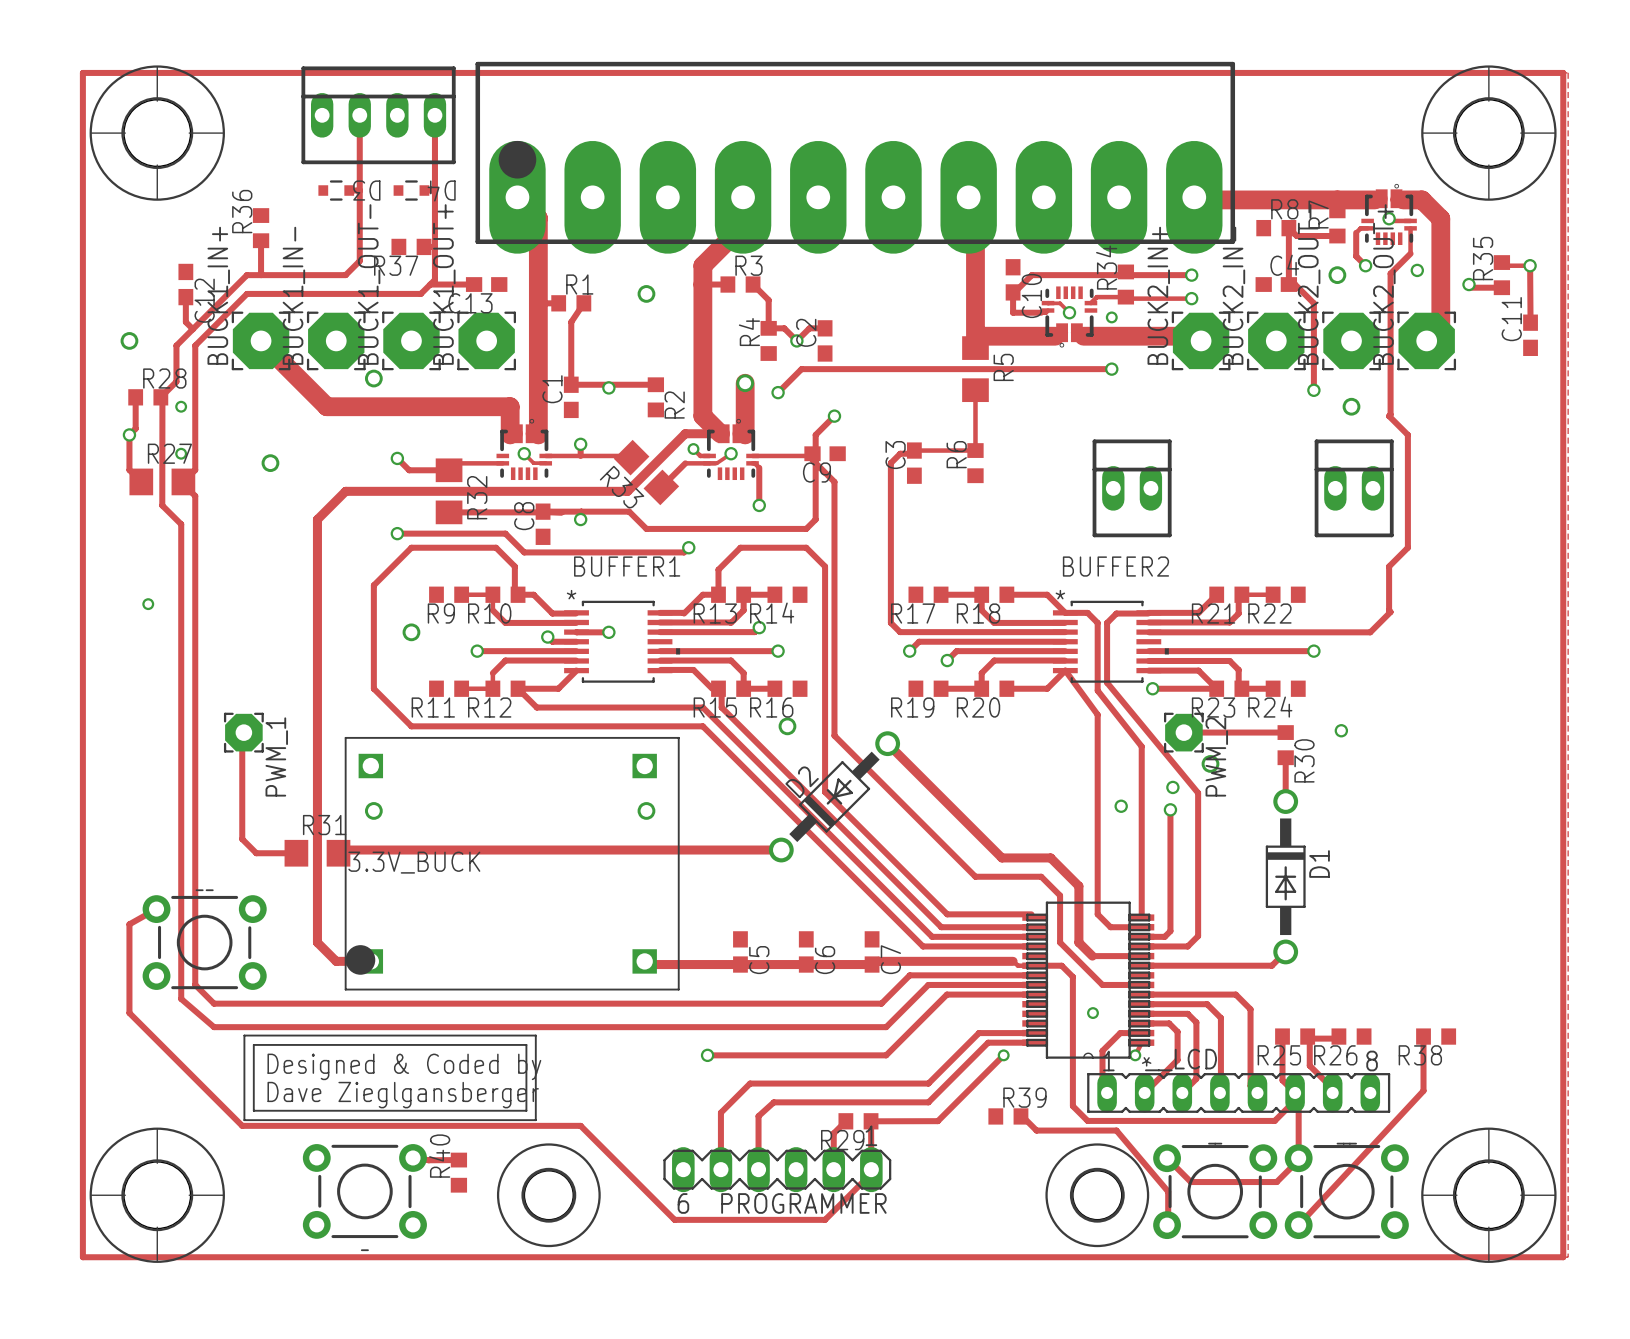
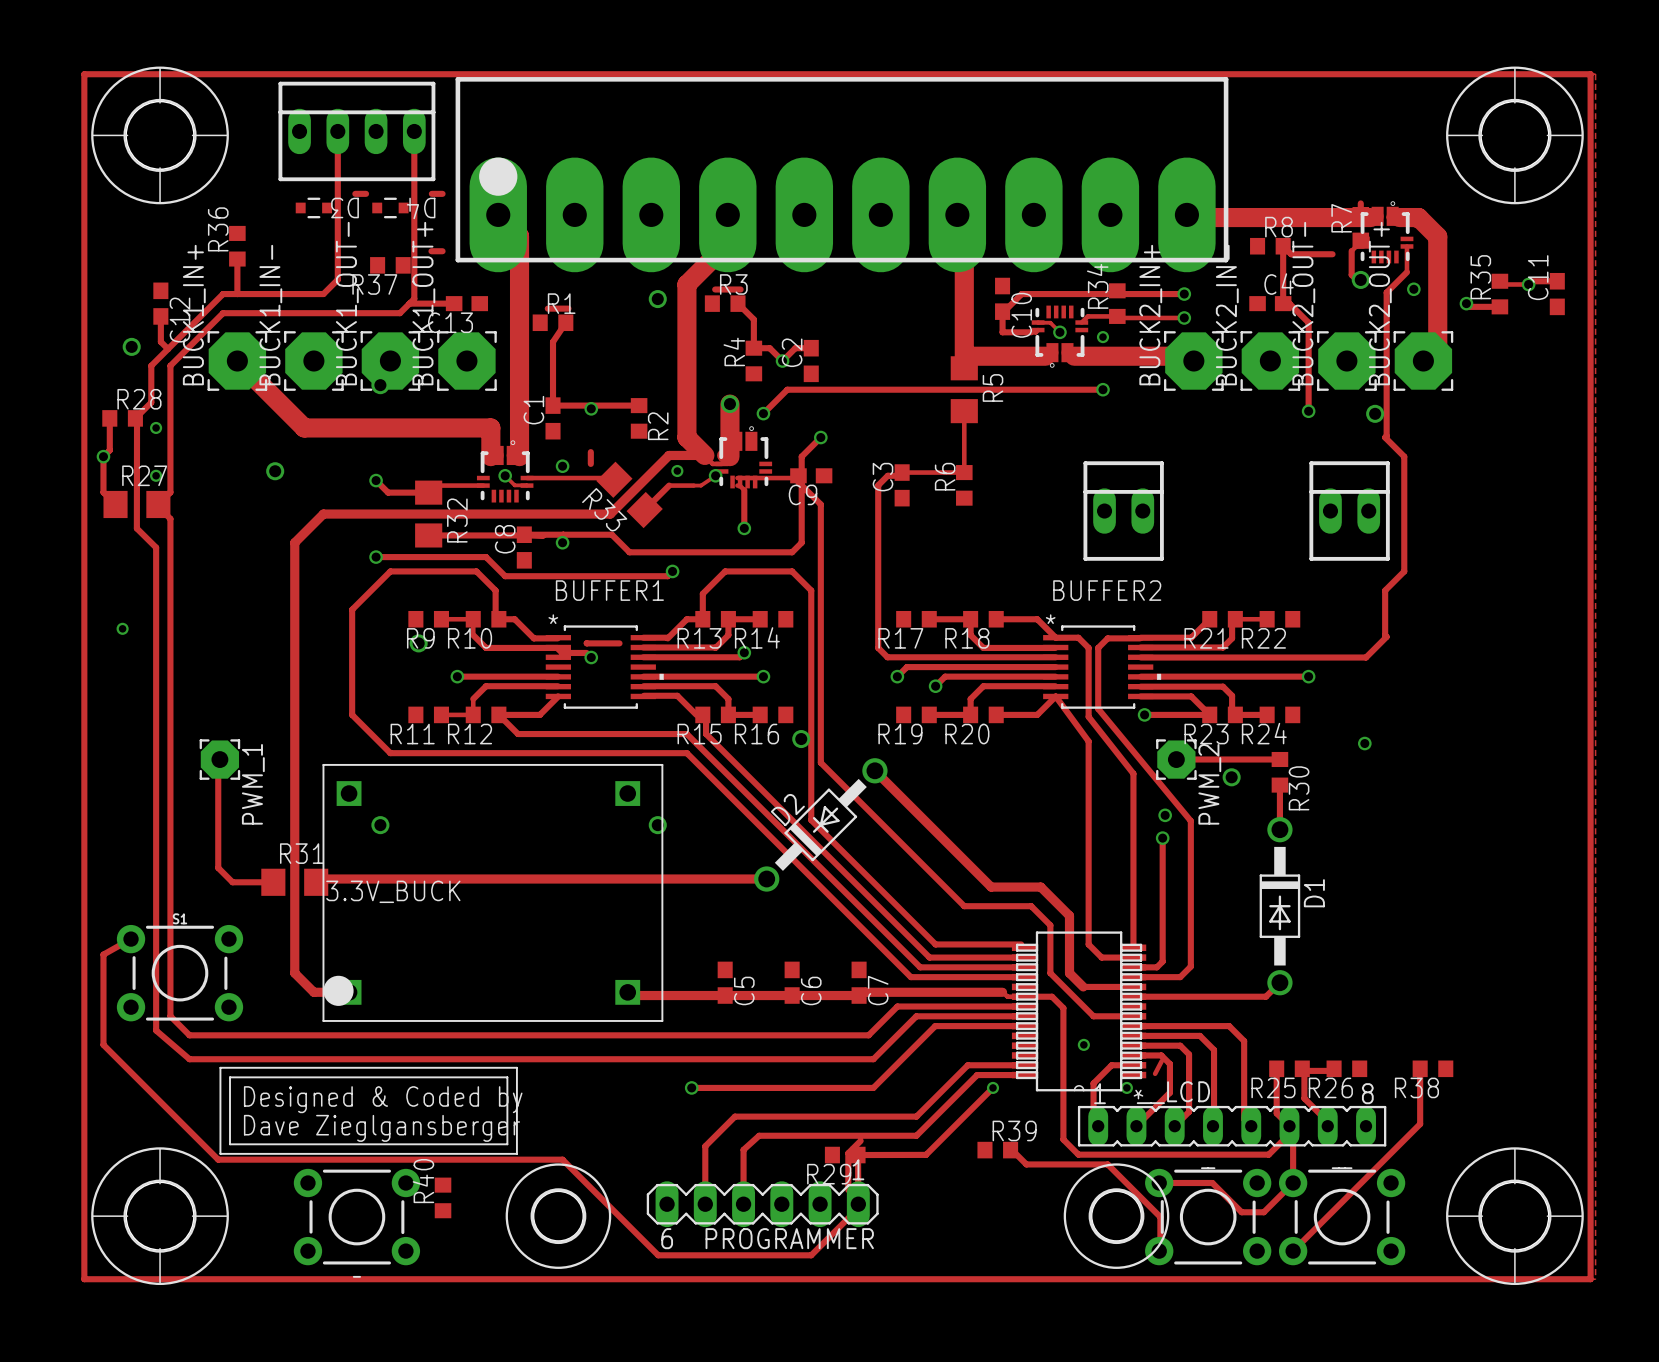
track: (359, 115) (359, 261) (345, 275) (246, 275) (176, 345) (176, 381) (160, 397) (162, 403) (162, 505) (181, 524) (181, 998) (214, 1027) (886, 1027) (928, 984) (1034, 984) -> (337, 131) (337, 279) (323, 294) (223, 294) (151, 365) (151, 402) (135, 418) (137, 424) (136, 528) (156, 547) (156, 1030) (189, 1059) (873, 1059) (916, 1016) (1024, 1016)
part: (378, 115) -> none
track: (434, 115) (434, 279) (420, 293) (246, 293) (195, 345) (195, 470) (183, 481) (195, 496) (195, 984) (214, 1003) (881, 1003) (909, 975) (1034, 975) -> (414, 131) (414, 298) (399, 313) (223, 313) (170, 365) (170, 492) (158, 504) (170, 518) (170, 1016) (189, 1035) (868, 1035) (897, 1006) (1024, 1006)
part: none -> (356, 131)
part position: (855, 157) -> (841, 174)
D3 position: (336, 190) -> (313, 207)
D4 position: (411, 190) -> (390, 207)
track: (517, 197) (538, 218) (538, 434) (531, 433) -> (498, 214) (519, 236) (519, 456) (512, 455)
track: (743, 197) (743, 225) (702, 265) (702, 416) (720, 433) -> (727, 214) (727, 243) (686, 284) (686, 437) (704, 455)
track: (968, 197) (975, 204) (975, 348) (977, 336) (1055, 336) (1062, 332) -> (957, 214) (964, 221) (964, 368) (965, 356) (1045, 356) (1049, 352) (1052, 352)
track: (1194, 197) (1196, 199) (1381, 198) -> (1186, 214) (1189, 217) (1377, 216)
track: (1396, 198) (1422, 199) (1440, 218) (1440, 326) (1426, 340) -> (1392, 216) (1418, 217) (1437, 236) (1437, 346) (1423, 361)
part position: (1389, 214) -> (1385, 232)
via: (1389, 218) -> none
R36 position: (261, 228) -> (237, 246)
R8 position: (1276, 228) -> (1270, 246)
track: (1367, 228) (1360, 228) (1356, 232) (1356, 256) (1365, 265) -> (1363, 246) (1356, 246) (1351, 251) (1351, 274) (1361, 284)
track: (1410, 228) (1410, 253) (1390, 273) (1389, 416) (1407, 434) (1407, 547) (1389, 566) (1390, 612) (1370, 632) (1148, 632) -> (1406, 246) (1406, 272) (1386, 292) (1385, 437) (1404, 456) (1404, 571) (1385, 590) (1386, 636) (1366, 657) (1140, 657)
track: (1337, 236) (1296, 236) (1288, 228) (1288, 284) (1295, 284) (1313, 303) (1313, 390) -> (1332, 254) (1291, 254) (1283, 246) (1283, 303) (1289, 303) (1308, 322) (1308, 411)
track: (261, 240) (261, 275) -> (237, 259) (237, 294)
R37 position: (411, 246) -> (390, 265)
track: (1501, 262) (1505, 265) (1530, 265) (1530, 262) (1530, 322) -> none
via: (1365, 265) -> none
via: (1530, 265) -> none
via: (1417, 270) -> none
track: (1191, 275) (1129, 275) (1125, 271) (1122, 275) (1031, 275) (1013, 292) (1013, 312) (1045, 312) (1048, 310) -> (1184, 294) (1120, 294) (1117, 290) (1114, 294) (1021, 294) (1002, 311) (1002, 332) (1035, 332) (1038, 330)
via: (1191, 275) -> none
R35 position: (1501, 275) -> (1499, 294)
track: none -> (1499, 281) (1503, 284) (1528, 284) (1528, 281) (1557, 281)
C10 position: (1013, 279) -> (1002, 298)
via: none -> (1528, 284)
C12 position: (185, 284) -> (160, 303)
track: (430, 284) (474, 284) -> (409, 303) (454, 303)
C13 position: (486, 284) -> (466, 303)
R3 position: (740, 284) -> (725, 303)
track: (753, 284) (768, 300) (768, 328) (784, 328) (796, 340) (809, 328) (825, 328) -> (737, 303) (753, 319) (753, 348) (769, 348) (782, 361) (795, 348) (811, 348)
R34 position: (1125, 284) -> (1117, 303)
C4 position: (1276, 284) -> (1270, 303)
via: none -> (1413, 289)
track: (1469, 284) (1469, 287) (1501, 287) -> (1466, 303) (1466, 306) (1499, 306)
via: (1469, 284) -> none
via: none -> (1184, 294)
track: (185, 297) (185, 322) (192, 329) -> (160, 316) (160, 341) (168, 349)
track: (1191, 298) (1096, 297) (1090, 303) -> (1184, 317) (1087, 316) (1081, 322)
via: (1191, 298) -> none
via: none -> (1466, 303)
R1 position: (571, 303) -> (553, 322)
track: (583, 303) (571, 322) (571, 384) (655, 384) -> (565, 322) (553, 341) (553, 405) (639, 405)
track: (1048, 303) (1060, 303) (1069, 312) -> (1038, 322) (1050, 322) (1059, 332)
via position: (1069, 312) -> (1059, 332)
via: none -> (1184, 317)
part position: (1069, 317) -> (1059, 336)
via position: (1111, 317) -> (1102, 337)
track: (1076, 332) (1083, 336) (1196, 336) (1201, 340) -> (1067, 352) (1070, 352) (1074, 356) (1189, 356) (1193, 361)
C11 position: (1530, 335) -> (1557, 294)
track: (261, 340) (326, 406) (510, 406) (510, 434) (516, 433) -> (237, 361) (304, 427) (490, 427) (490, 456) (497, 455)
BUCK1_IN+ position: (261, 340) -> (237, 361)
BUCK1_IN- position: (336, 340) -> (313, 361)
BUCK1_OUT- position: (411, 340) -> (390, 361)
BUCK1_OUT+ position: (486, 340) -> (466, 361)
R4 position: (768, 340) -> (753, 361)
via: (796, 340) -> none
C2 position: (825, 340) -> (811, 361)
BUCK2_IN+ position: (1201, 340) -> (1193, 361)
BUCK2_IN- position: (1276, 340) -> (1270, 361)
BUCK2_OUT- position: (1351, 340) -> (1346, 361)
BUCK2_OUT+ position: (1426, 340) -> (1423, 361)
via: none -> (782, 361)
R5 position: (975, 369) -> (964, 389)
track: (1111, 369) (801, 369) (778, 392) -> (1102, 389) (787, 389) (763, 413)
via position: (1111, 369) -> (1102, 389)
track: (745, 383) (745, 434) (738, 433) -> (729, 404) (729, 456) (723, 455)
via position: (745, 383) -> (729, 404)
via: (608, 387) -> none
track: (975, 390) (975, 450) (914, 450) (911, 453) (900, 453) (890, 463) (890, 622) (900, 632) (1065, 632) -> (964, 411) (964, 472) (902, 472) (898, 475) (887, 475) (878, 485) (878, 647) (887, 657) (1055, 657)
via position: (1313, 390) -> (1308, 411)
via: (778, 392) -> none
track: (135, 397) (135, 428) (129, 434) (129, 470) (141, 481) -> (109, 418) (109, 450) (103, 456) (103, 492) (115, 504)
R28 position: (148, 397) -> (122, 418)
C1 position: (571, 397) -> (553, 418)
R2 position: (655, 397) -> (639, 418)
via: none -> (591, 408)
via: (181, 406) -> none
via: none -> (763, 413)
track: (834, 416) (815, 434) (815, 519) (806, 528) (646, 528) (629, 511) (449, 512) -> (820, 437) (801, 456) (801, 542) (792, 552) (629, 552) (611, 534) (428, 535)
via: (834, 416) -> none
via: none -> (156, 427)
via: none -> (820, 437)
track: (720, 433) (685, 433) (627, 491) (345, 491) (317, 519) (317, 942) (336, 961) (370, 961) -> (704, 455) (669, 455) (610, 514) (323, 514) (294, 542) (294, 973) (313, 992) (348, 992)
via position: (129, 434) -> (103, 456)
via: (580, 444) -> none
part position: (524, 449) -> (505, 471)
via position: (693, 449) -> (677, 471)
via: (181, 453) -> none
track: (524, 453) (533, 463) (545, 463) -> (505, 475) (514, 485) (527, 485)
via: (524, 453) -> none
track: (731, 453) (716, 463) (685, 463) (661, 487) -> (715, 475) (701, 485) (669, 485) (644, 510)
via: (731, 453) -> none
track: (812, 453) (812, 455) (752, 455) -> (798, 475) (798, 478) (737, 478)
track: (812, 453) (812, 459) (834, 481) (834, 735) (975, 876) (1041, 876) (1060, 895) (1060, 942) (1102, 984) (1141, 984) -> (798, 475) (798, 482) (820, 504) (820, 762) (964, 906) (1031, 906) (1050, 925) (1050, 973) (1093, 1016) (1133, 1016)
C9 position: (825, 453) -> (811, 475)
track: (545, 455) (631, 455) (631, 457) -> (527, 478) (614, 478) (614, 479)
track: (397, 458) (409, 470) (449, 470) (455, 463) (502, 463) -> (376, 480) (388, 492) (428, 492) (435, 485) (483, 485)
via position: (397, 458) -> (376, 480)
via: none -> (562, 466)
track: (752, 463) (759, 467) (759, 505) -> (737, 485) (744, 490) (744, 528)
C3 position: (914, 463) -> (902, 485)
R6 position: (975, 463) -> (964, 485)
via: none -> (156, 475)
via: none -> (505, 475)
via: none -> (715, 475)
R33 position: (646, 472) -> (629, 494)
R27 position: (162, 481) -> (136, 504)
part position: (1132, 488) -> (1123, 511)
part position: (1354, 488) -> (1349, 511)
R32 position: (449, 491) -> (428, 514)
via: (759, 505) -> none
via position: (580, 519) -> (562, 542)
via: none -> (744, 528)
C8 position: (543, 524) -> (524, 547)
track: (397, 533) (505, 533) (524, 552) (684, 552) (688, 547) -> (376, 557) (486, 557) (505, 576) (667, 576) (672, 571)
via position: (397, 533) -> (376, 557)
via: (688, 547) -> none
via: none -> (672, 571)
R9 position: (449, 594) -> (428, 619)
track: (461, 594) (492, 594) (492, 610) (505, 622) (576, 622) -> (441, 619) (473, 619) (473, 635) (486, 647) (558, 647)
R10 position: (505, 594) -> (486, 619)
R13 position: (731, 594) -> (715, 619)
track: (774, 594) (743, 594) (743, 610) (731, 622) (660, 622) -> (760, 619) (728, 619) (728, 635) (715, 647) (643, 647)
R14 position: (787, 594) -> (773, 619)
R17 position: (928, 594) -> (916, 619)
track: (941, 594) (981, 594) (981, 610) (994, 622) (1065, 622) -> (929, 619) (970, 619) (970, 635) (983, 647) (1055, 647)
R18 position: (994, 594) -> (983, 619)
track: (1006, 594) (1047, 594) (1065, 612) (1087, 612) (1097, 622) (1097, 690) (1141, 746) (1141, 917) -> (996, 619) (1037, 619) (1055, 637) (1078, 637) (1088, 647) (1088, 716) (1133, 773) (1133, 947)
track: (1216, 594) (1198, 612) (1116, 613) (1107, 622) (1107, 682) (1198, 793) (1198, 936) (1187, 946) (1141, 946) -> (1209, 619) (1191, 637) (1107, 638) (1098, 647) (1098, 708) (1190, 821) (1190, 966) (1180, 977) (1133, 977)
R21 position: (1229, 594) -> (1222, 619)
track: (1273, 594) (1241, 594) (1238, 597) (1238, 613) (1229, 622) (1148, 622) -> (1267, 619) (1235, 619) (1232, 622) (1232, 638) (1223, 647) (1140, 647)
R22 position: (1285, 594) -> (1279, 619)
via position: (148, 604) -> (122, 628)
track: (576, 612) (552, 613) (533, 594) (518, 594) (514, 591) (514, 566) (496, 547) (411, 547) (373, 585) (373, 688) (411, 726) (702, 726) (923, 946) (1034, 946) -> (558, 637) (533, 638) (514, 619) (498, 619) (495, 616) (495, 590) (476, 571) (390, 571) (352, 609) (352, 714) (390, 753) (686, 753) (910, 977) (1024, 977)
track: (660, 612) (684, 613) (702, 594) (718, 594) (718, 569) (740, 547) (806, 547) (825, 566) (825, 792) (947, 914) (1031, 914) (1034, 917) -> (643, 637) (667, 638) (686, 619) (702, 619) (702, 593) (725, 571) (792, 571) (811, 590) (811, 820) (935, 944) (1021, 944) (1024, 947)
track: (759, 627) (754, 632) (660, 632) -> (744, 652) (739, 657) (643, 657)
via: (759, 627) -> none
via: (608, 632) -> none
via: (547, 637) -> none
BUFFER1 position: (622, 641) -> (604, 667)
via: none -> (744, 652)
track: (1065, 641) (919, 641) (909, 651) -> (1055, 667) (906, 667) (897, 676)
BUFFER2 position: (1110, 641) -> (1102, 667)
via: none -> (591, 657)
track: (477, 651) (576, 651) -> (457, 676) (558, 676)
via position: (477, 651) -> (457, 676)
track: (778, 651) (660, 651) -> (763, 676) (643, 676)
via: (778, 651) -> none
via: (909, 651) -> none
track: (1065, 651) (956, 651) (947, 660) -> (1055, 676) (945, 676) (935, 686)
track: (1313, 651) (1148, 651) -> (1308, 676) (1140, 676)
via position: (1313, 651) -> (1308, 676)
track: (576, 660) (505, 660) (492, 673) (492, 688) (461, 688) -> (558, 686) (486, 686) (473, 699) (473, 714) (441, 714)
track: (660, 660) (731, 660) (743, 673) (743, 688) (774, 688) -> (643, 686) (715, 686) (728, 699) (728, 714) (760, 714)
via: (947, 660) -> none
track: (1065, 660) (994, 660) (981, 673) (981, 688) (941, 688) -> (1055, 686) (983, 686) (970, 699) (970, 714) (929, 714)
track: (1148, 660) (1229, 660) (1238, 669) (1238, 685) (1241, 688) (1273, 688) -> (1140, 686) (1223, 686) (1232, 695) (1232, 711) (1235, 714) (1267, 714)
via: none -> (763, 676)
via: none -> (897, 676)
track: (575, 669) (558, 688) (518, 688) (536, 707) (702, 707) (932, 936) (1034, 936) -> (557, 695) (539, 714) (498, 714) (517, 734) (686, 734) (920, 967) (1024, 967)
track: (660, 670) (693, 669) (712, 688) (718, 688) (721, 691) (721, 707) (941, 927) (1034, 927) -> (643, 696) (677, 695) (696, 714) (702, 714) (706, 718) (706, 734) (929, 957) (1024, 957)
track: (1148, 670) (1198, 670) (1216, 688) (1152, 688) -> (1140, 696) (1191, 696) (1209, 714) (1144, 714)
via: none -> (935, 686)
R11 position: (449, 688) -> (428, 714)
R12 position: (505, 688) -> (486, 714)
R15 position: (731, 688) -> (715, 714)
R16 position: (787, 688) -> (773, 714)
R19 position: (928, 688) -> (916, 714)
R20 position: (994, 688) -> (983, 714)
track: (1006, 688) (1047, 688) (1065, 670) (1097, 714) (1097, 914) (1110, 927) (1141, 927) -> (996, 714) (1037, 714) (1055, 696) (1088, 741) (1088, 944) (1101, 957) (1133, 957)
via position: (1152, 688) -> (1144, 714)
R23 position: (1229, 688) -> (1222, 714)
R24 position: (1285, 688) -> (1279, 714)
track: (243, 732) (242, 734) (242, 839) (256, 853) (296, 853) -> (219, 759) (218, 761) (218, 867) (232, 882) (273, 882)
PWM_1 position: (243, 732) -> (219, 759)
track: (1183, 732) (1285, 732) -> (1176, 759) (1279, 759)
PWM_2 position: (1183, 732) -> (1176, 759)
track: (887, 743) (1001, 857) (1050, 857) (1078, 886) (1078, 942) (1092, 956) (1141, 956) -> (874, 770) (991, 887) (1040, 887) (1069, 915) (1069, 973) (1083, 986) (1133, 986)
R30 position: (1285, 745) -> (1279, 772)
track: (1285, 757) (1285, 801) -> (1279, 785) (1279, 829)
via: (1172, 787) -> none
D2 position: (834, 796) -> (820, 824)
via: none -> (1165, 815)
via: (1121, 806) -> none
track: (1170, 809) (1170, 931) (1164, 936) (1141, 936) -> (1162, 838) (1162, 961) (1156, 967) (1133, 967)
via: (1170, 809) -> none
via: none -> (1162, 838)
track: (781, 850) (341, 850) (338, 853) -> (766, 879) (319, 879) (316, 882)
R31 position: (317, 853) -> (294, 882)
3.3V_BUCK position: (512, 863) -> (492, 892)
D1 position: (1285, 876) -> (1279, 906)
track: (156, 909) (129, 924) (129, 1013) (242, 1125) (580, 1125) (674, 1219) (825, 1219) (871, 1173) (871, 1121) (937, 1121) (1003, 1055) -> (131, 939) (103, 954) (103, 1044) (218, 1159) (562, 1159) (658, 1255) (811, 1255) (858, 1208) (858, 1155) (926, 1154) (992, 1087)
part: (204, 942) -> none
C5 position: (740, 951) -> (725, 982)
C6 position: (806, 951) -> (792, 982)
C7 position: (872, 951) -> (859, 982)
track: (1285, 951) (1271, 965) (1141, 965) -> (1279, 982) (1265, 996) (1133, 996)
S1: none -> (179, 973)
track: (644, 961) (647, 964) (872, 964) (878, 961) (1013, 961) (1018, 965) (1061, 965) (1072, 976) (1072, 1106) (1087, 1120) (1274, 1120) (1295, 1100) (1295, 1092) -> (627, 992) (630, 995) (859, 995) (865, 992) (1002, 992) (1007, 996) (1052, 996) (1063, 1008) (1063, 1139) (1078, 1154) (1268, 1154) (1289, 1133) (1289, 1126)
part position: (1088, 980) -> (1079, 1011)
track: (1034, 994) (946, 994) (886, 1055) (707, 1055) -> (1024, 1026) (935, 1026) (873, 1087) (691, 1087)
track: (1141, 994) (1235, 994) (1250, 1009) (1250, 1086) (1257, 1092) -> (1133, 1026) (1229, 1026) (1244, 1041) (1244, 1119) (1251, 1126)
track: (1141, 1004) (1207, 1004) (1220, 1018) (1219, 1092) -> (1133, 1035) (1199, 1035) (1214, 1049) (1212, 1126)
via: (1092, 1013) -> none
track: (1141, 1013) (1187, 1013) (1196, 1022) (1196, 1078) (1182, 1092) -> (1133, 1045) (1180, 1045) (1189, 1054) (1189, 1111) (1174, 1126)
track: (1141, 1023) (1169, 1023) (1177, 1031) (1177, 1060) (1144, 1092) -> (1133, 1055) (1161, 1055) (1169, 1064) (1169, 1092) (1136, 1126)
via: none -> (1083, 1044)
track: (1034, 1033) (978, 1033) (928, 1083) (750, 1083) (720, 1112) (720, 1169) -> (1024, 1065) (967, 1065) (916, 1116) (734, 1116) (705, 1146) (705, 1204)
track: (1141, 1033) (1120, 1033) (1102, 1050) (1102, 1088) (1107, 1092) -> (1133, 1065) (1111, 1065) (1093, 1083) (1093, 1121) (1098, 1126)
track: (1282, 1036) (1282, 1080) (1298, 1096) (1298, 1160) (1276, 1182) (1190, 1182) (1167, 1158) -> none
R25 position: (1295, 1036) -> (1289, 1068)
track: (1338, 1036) (1336, 1038) (1309, 1038) -> (1334, 1068) (1331, 1070) (1304, 1070)
R26 position: (1351, 1036) -> (1346, 1068)
track: (1423, 1036) (1423, 1090) (1298, 1225) -> none
R38 position: (1436, 1036) -> (1432, 1068)
track: (1309, 1038) (1309, 1065) (1332, 1088) (1332, 1092) -> (1304, 1070) (1304, 1098) (1327, 1121) (1327, 1126)
track: (1034, 1042) (988, 1042) (928, 1102) (773, 1102) (758, 1116) (758, 1169) -> (1024, 1075) (977, 1075) (916, 1135) (759, 1135) (743, 1149) (743, 1204)
track: none -> (1276, 1068) (1276, 1113) (1293, 1129) (1293, 1183) (1263, 1212) (1241, 1212) (1212, 1183) (1159, 1183)
track: none -> (1420, 1068) (1420, 1124) (1293, 1251)
via position: (707, 1055) -> (691, 1087)
via position: (1003, 1055) -> (992, 1087)
via: (1135, 1055) -> none
via: none -> (1126, 1087)
drawing position: (390, 1077) -> (368, 1110)
__LCD position: (1238, 1092) -> (1232, 1126)
R39 position: (1008, 1116) -> (997, 1150)
track: (1020, 1116) (1036, 1130) (1116, 1130) (1168, 1191) (1167, 1225) -> none
R29 position: (858, 1121) -> (845, 1155)
track: none -> (1010, 1150) (1026, 1164) (1107, 1164) (1160, 1217) (1159, 1251)
track: (413, 1157) (428, 1160) (458, 1160) -> none
PROGRAMMER position: (777, 1169) -> (762, 1204)
R40 position: (458, 1172) -> (443, 1197)
part position: (364, 1191) -> (356, 1217)
part position: (1215, 1191) -> (1208, 1217)
part position: (1346, 1191) -> (1342, 1217)

